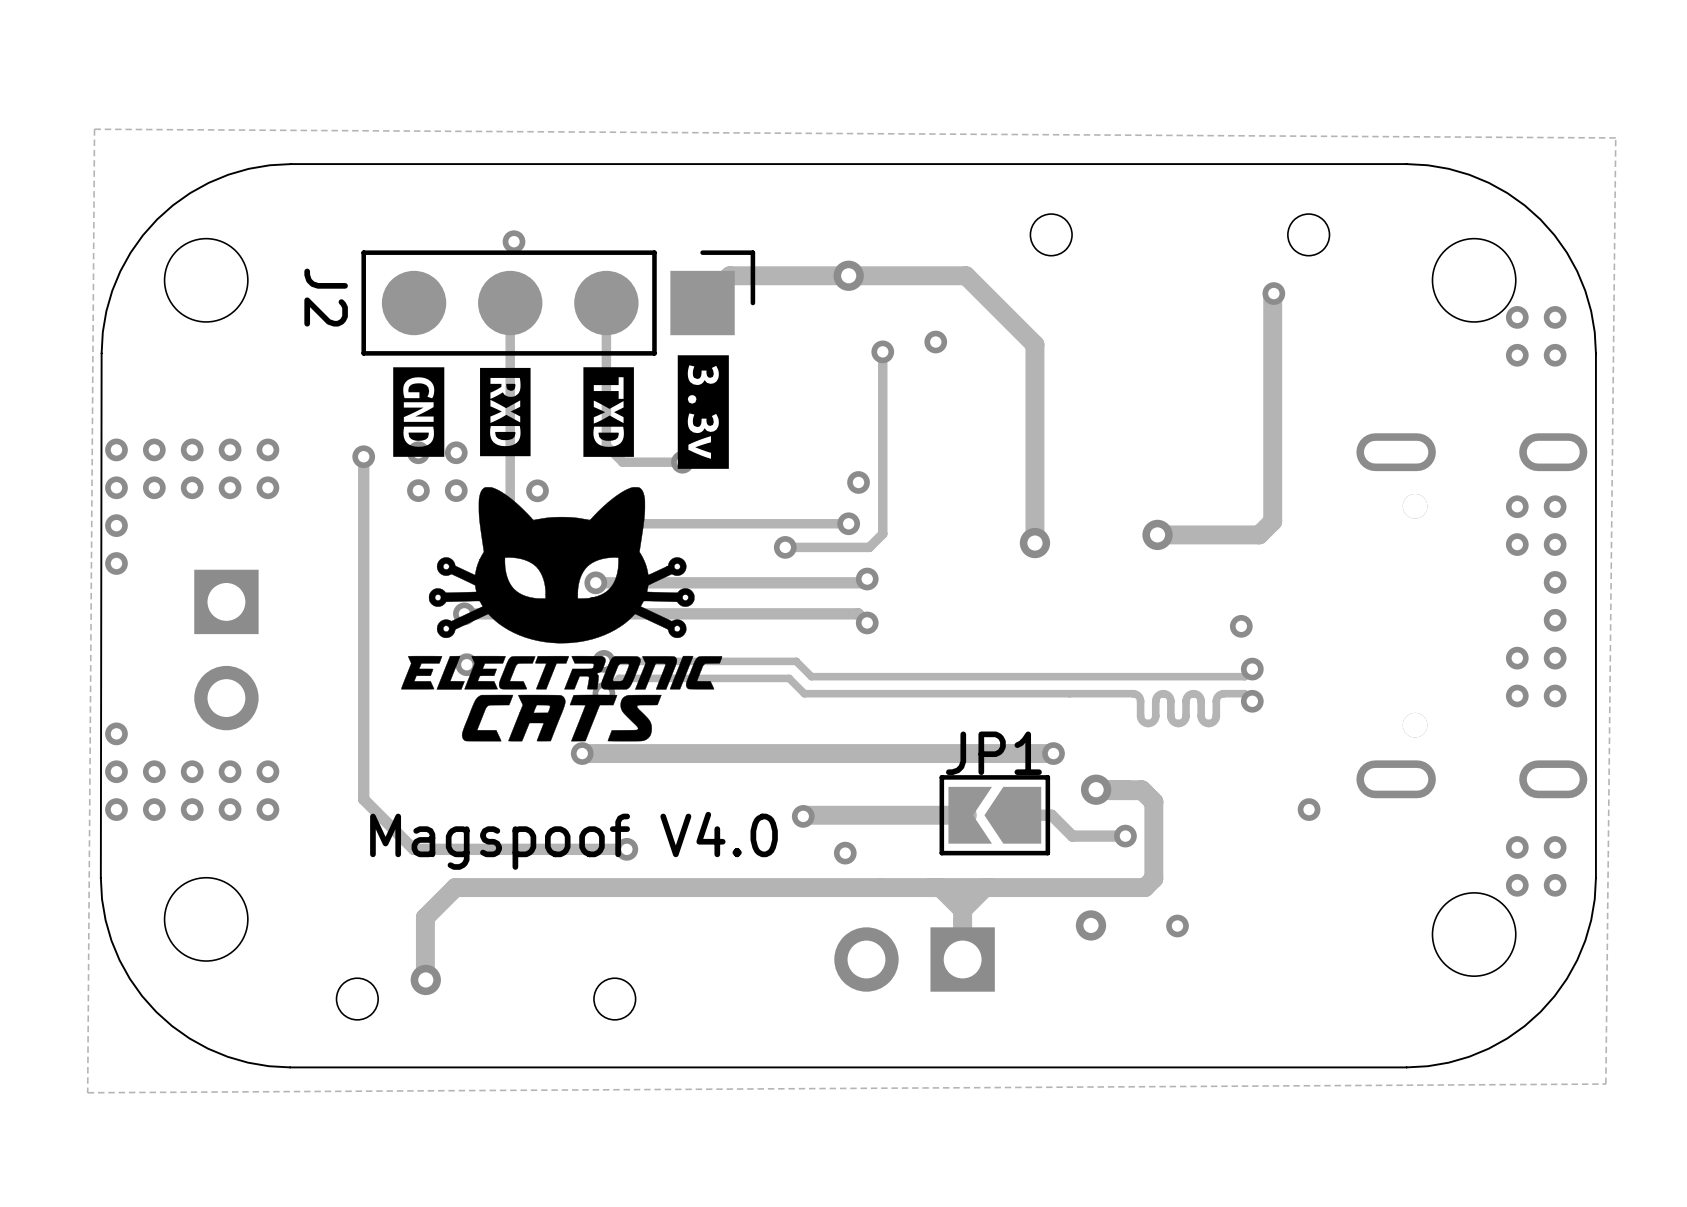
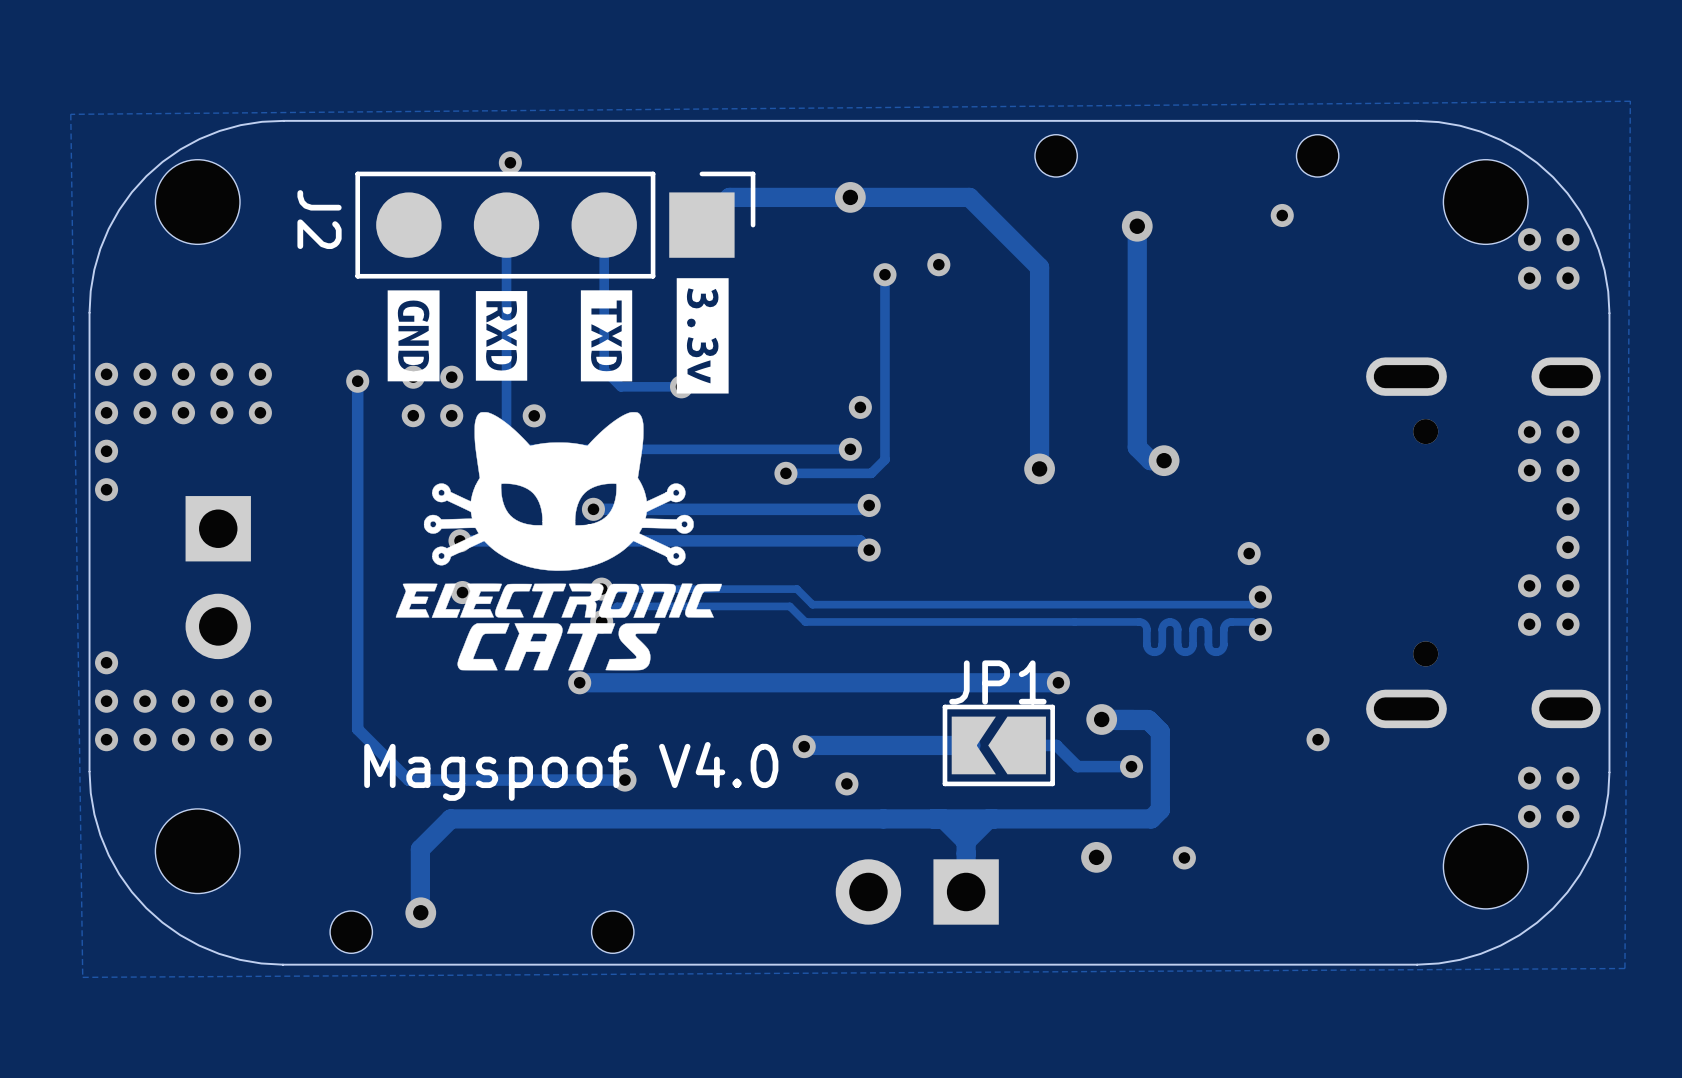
zone outline: (94, 129) (1615, 137) (1605, 1084) (87, 1092) (94, 129) -> (1630, 101) (1624, 968) (82, 977) (70, 114) (1630, 101)
track: (1273, 293) (1272, 521) (1259, 534) (1157, 534) -> (1137, 226) (1137, 447) (1150, 460) (1164, 460)
via: none -> (1137, 226)
board edge: (1595, 389) (1594, 332) (1591, 311) (1577, 271) (1554, 235) (1524, 205) (1507, 193) (1469, 174) (1427, 165) (290, 164) (269, 165) (228, 174) (190, 193) (157, 219) (130, 252) (112, 290) (106, 311) (101, 353) (100, 878) (102, 899) (111, 940) (129, 978) (142, 996) (172, 1026) (208, 1048) (227, 1056) (268, 1066) (1406, 1067) (1448, 1062) (1488, 1048) (1524, 1026) (1554, 996) (1577, 960) (1591, 920) (1594, 899) (1595, 841) -> (1609, 313) (1604, 270) (1598, 249) (1579, 210) (1553, 177) (1519, 150) (1480, 131) (1438, 122) (1417, 120) (262, 121) (240, 125) (199, 139) (162, 161) (146, 176) (119, 209) (108, 228) (94, 269) (89, 312) (89, 771) (94, 814) (108, 855) (131, 892) (146, 908) (180, 935) (219, 953) (261, 963) (282, 964) (1438, 963) (1480, 953) (1500, 945) (1519, 935) (1553, 908) (1567, 892) (1590, 855) (1604, 815) (1609, 772)

